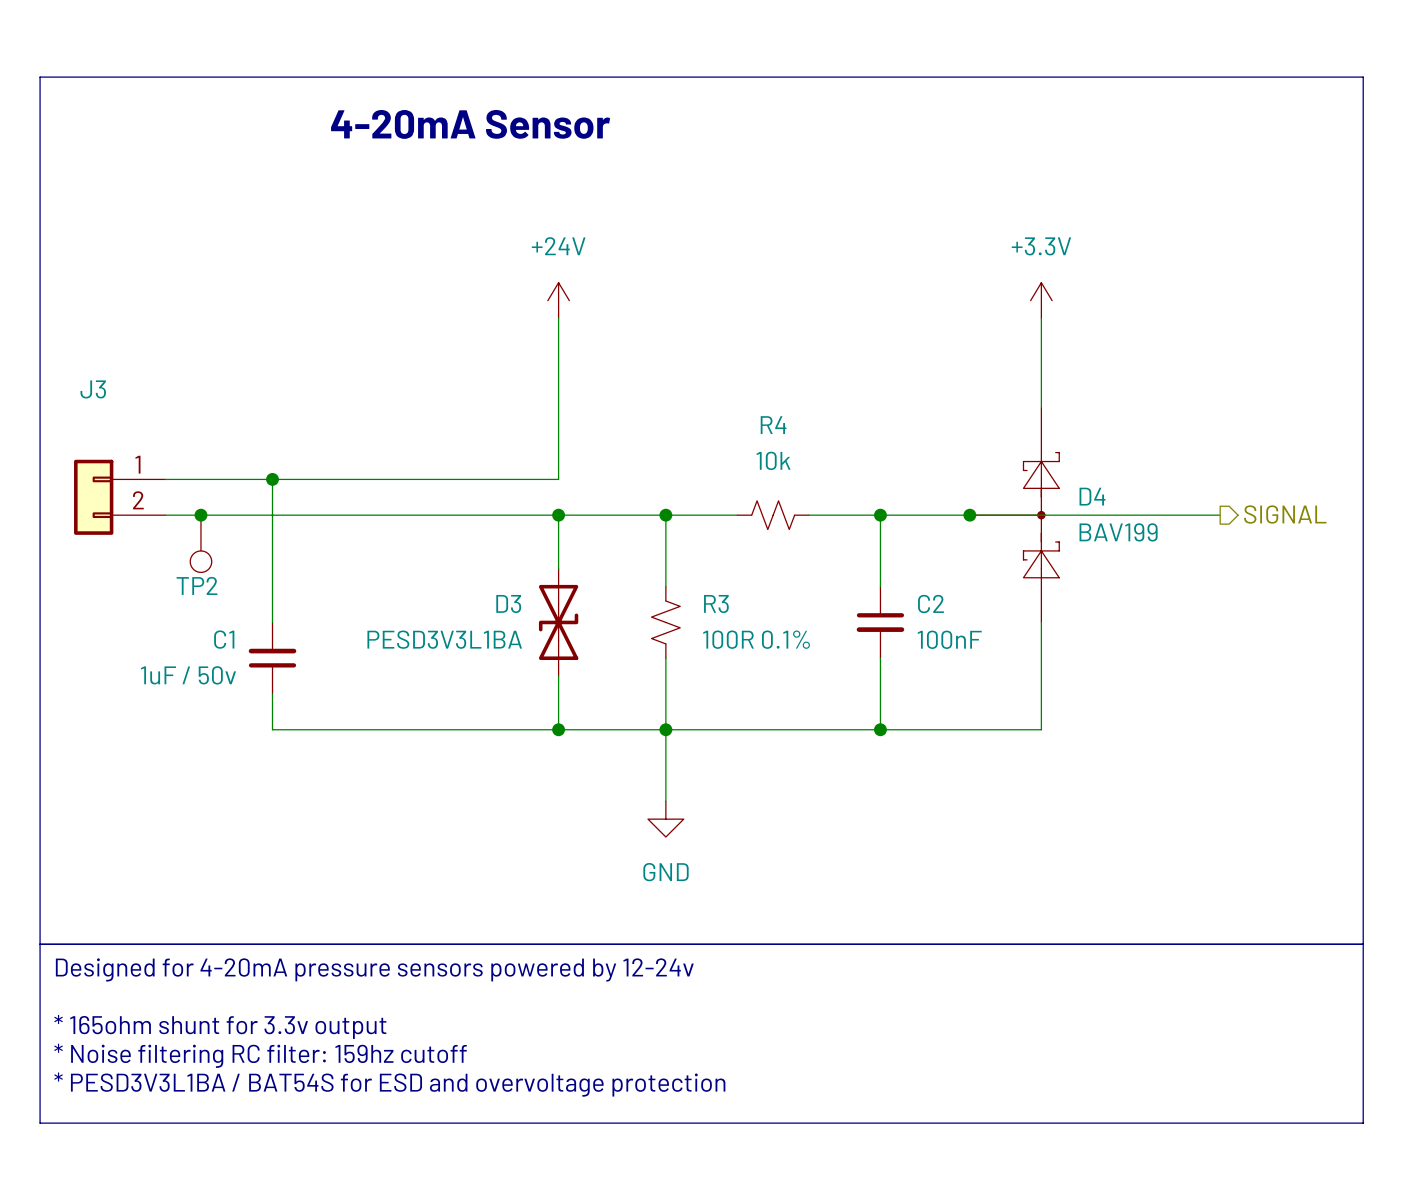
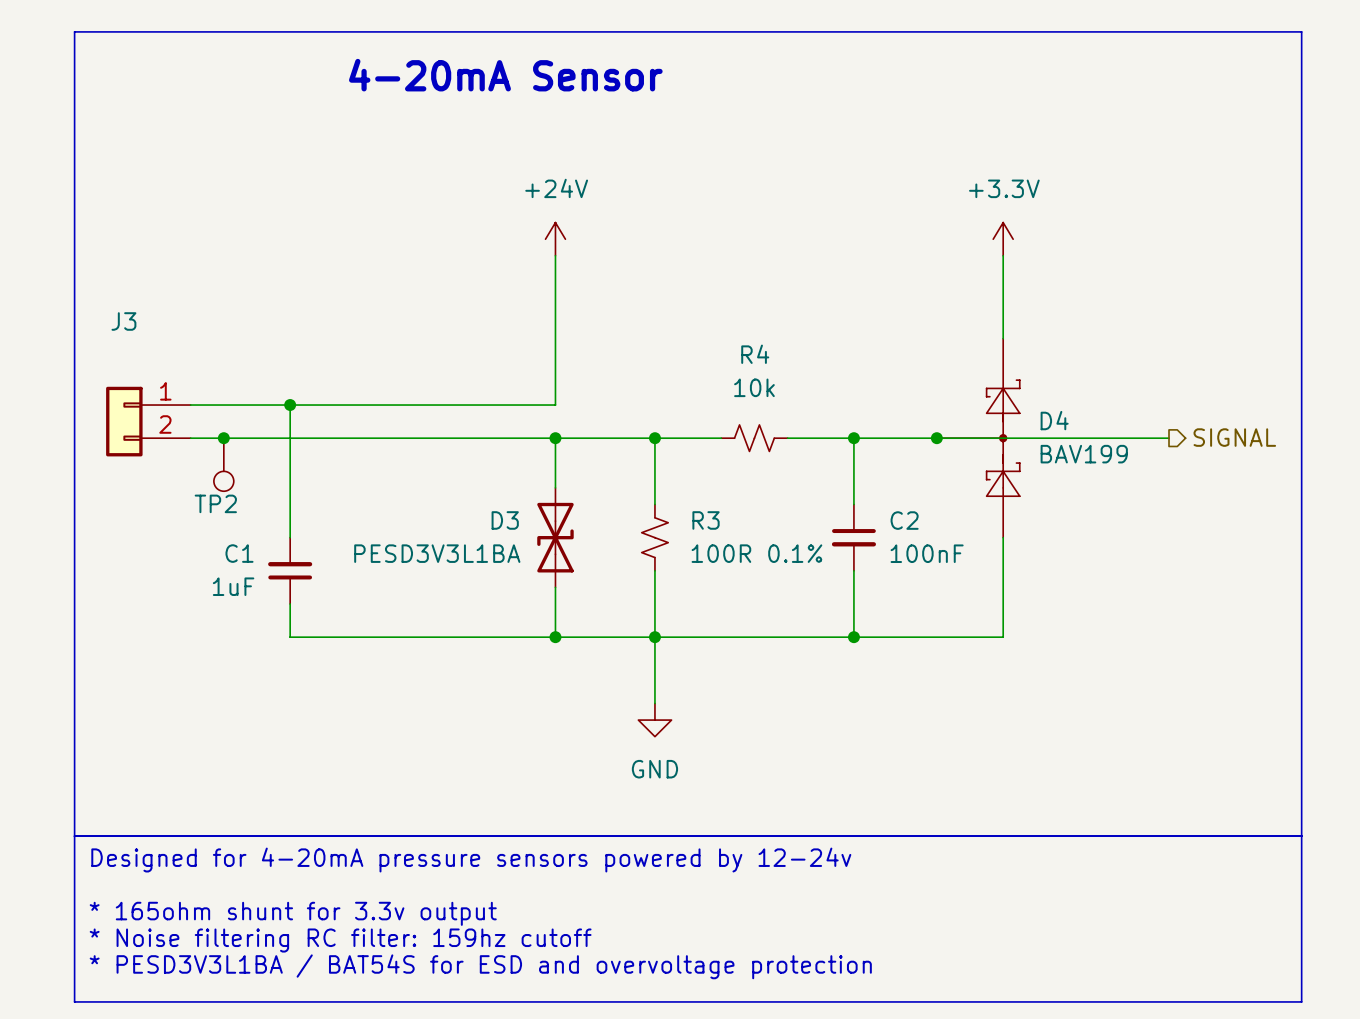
C1 value: 1uF / 50v (188, 675) -> 1uF (233, 586)

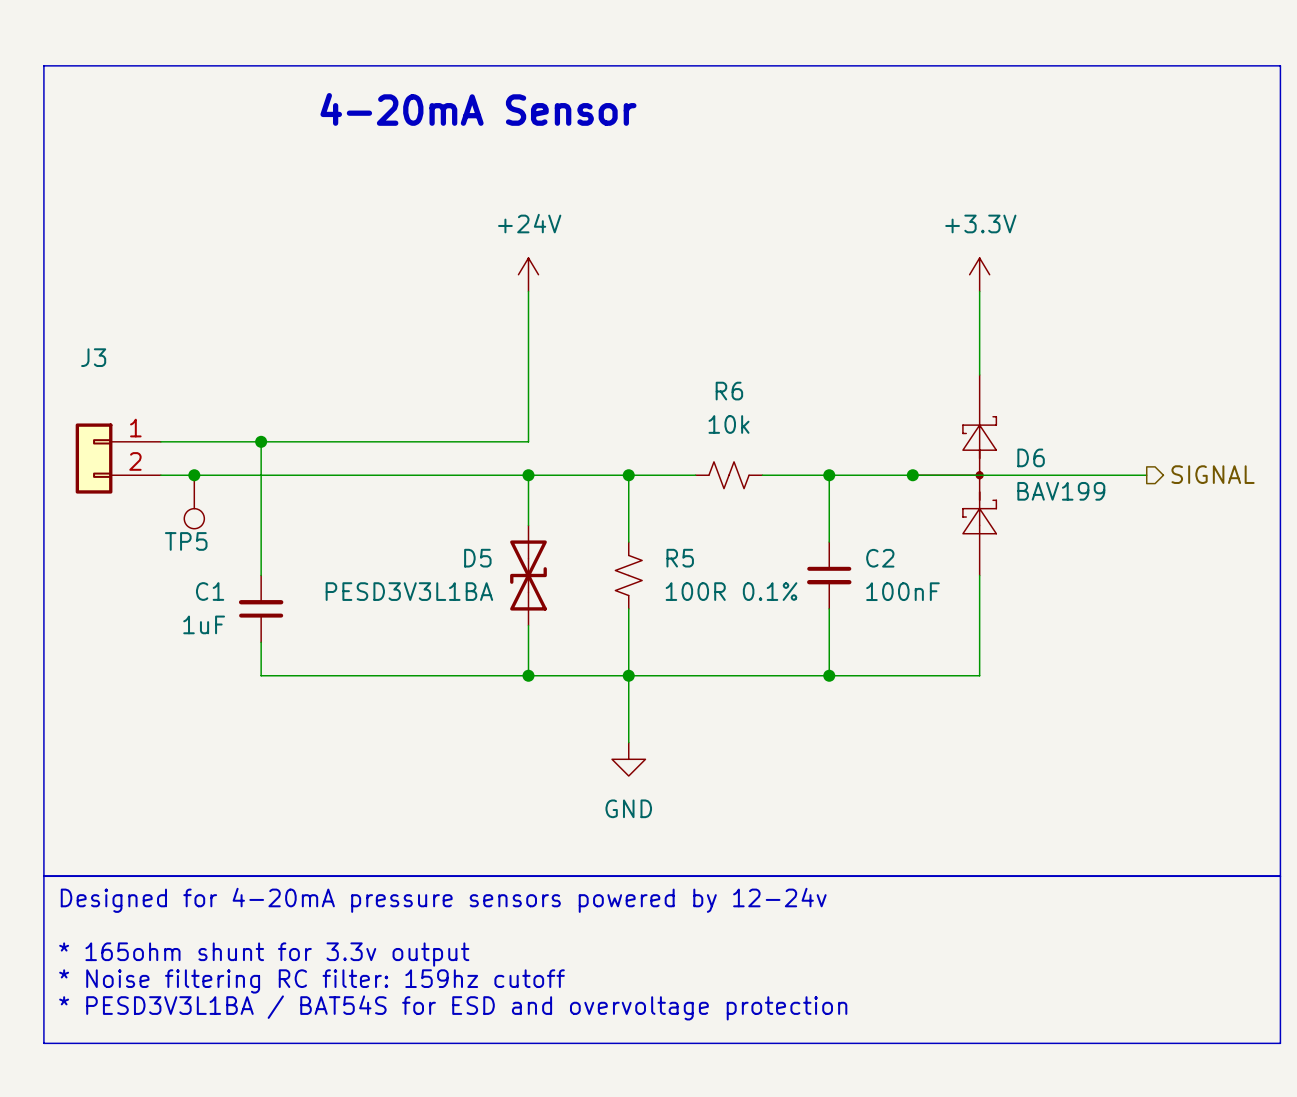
R4 name: R4 (755, 354) -> R6 (729, 391)
D4 name: D4 (1054, 420) -> D6 (1031, 457)
TP2 name: TP2 (215, 503) -> TP5 (186, 541)
D3 name: D3 (505, 520) -> D5 (477, 558)
R3 name: R3 (706, 520) -> R5 (680, 558)

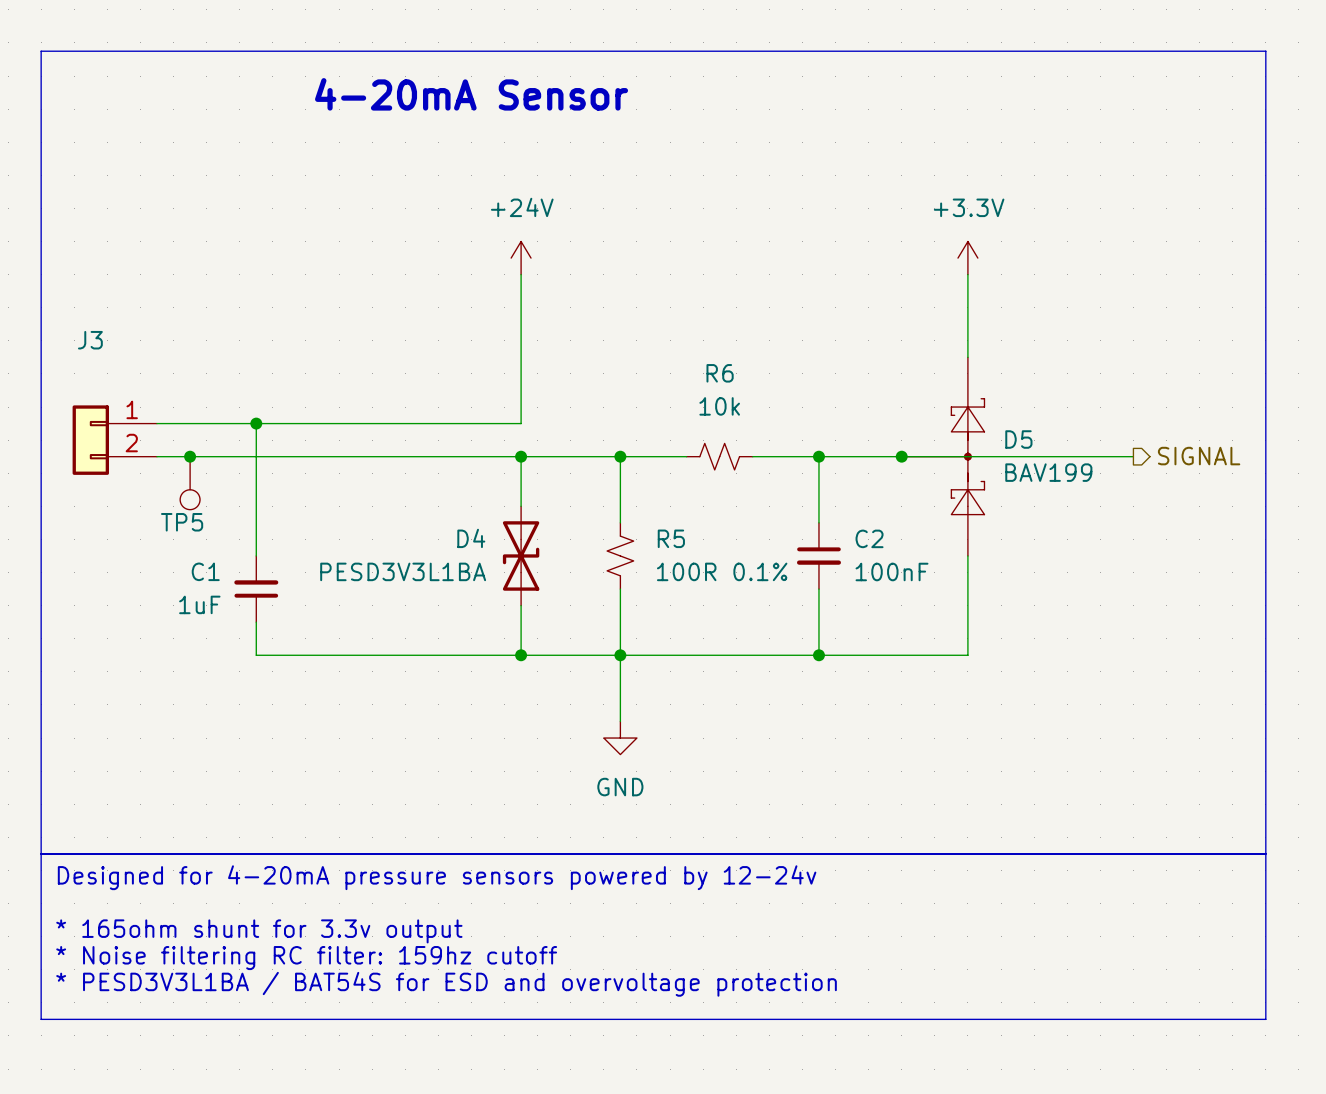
D6 name: D6 (1031, 457) -> D5 (1018, 439)
D5 name: D5 (477, 558) -> D4 (471, 538)

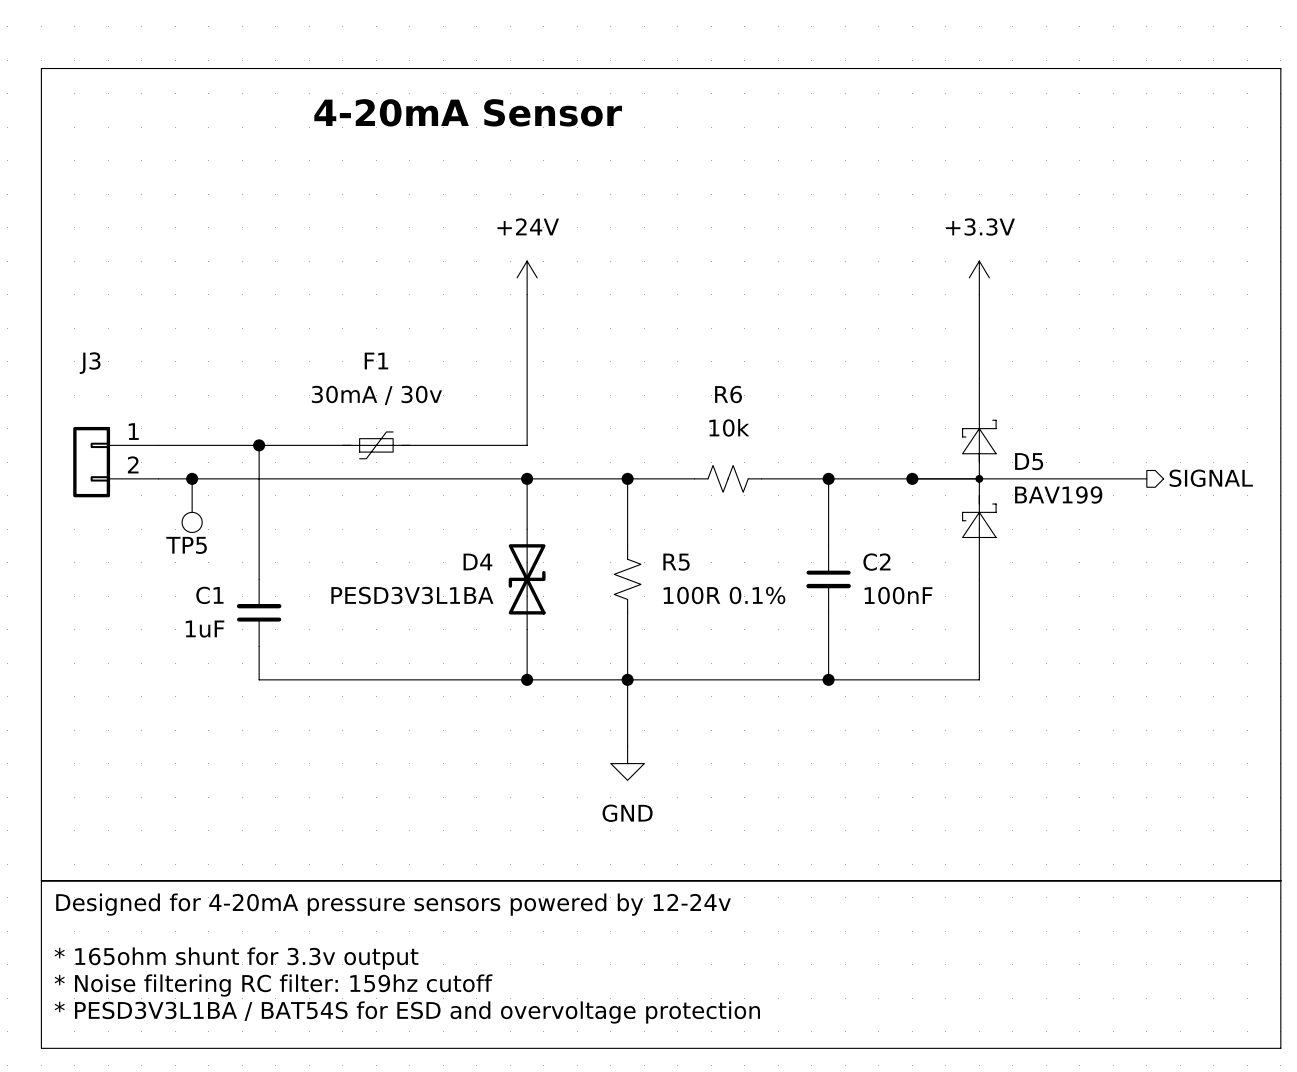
F1: none -> 30mA / 30v (376, 445)

